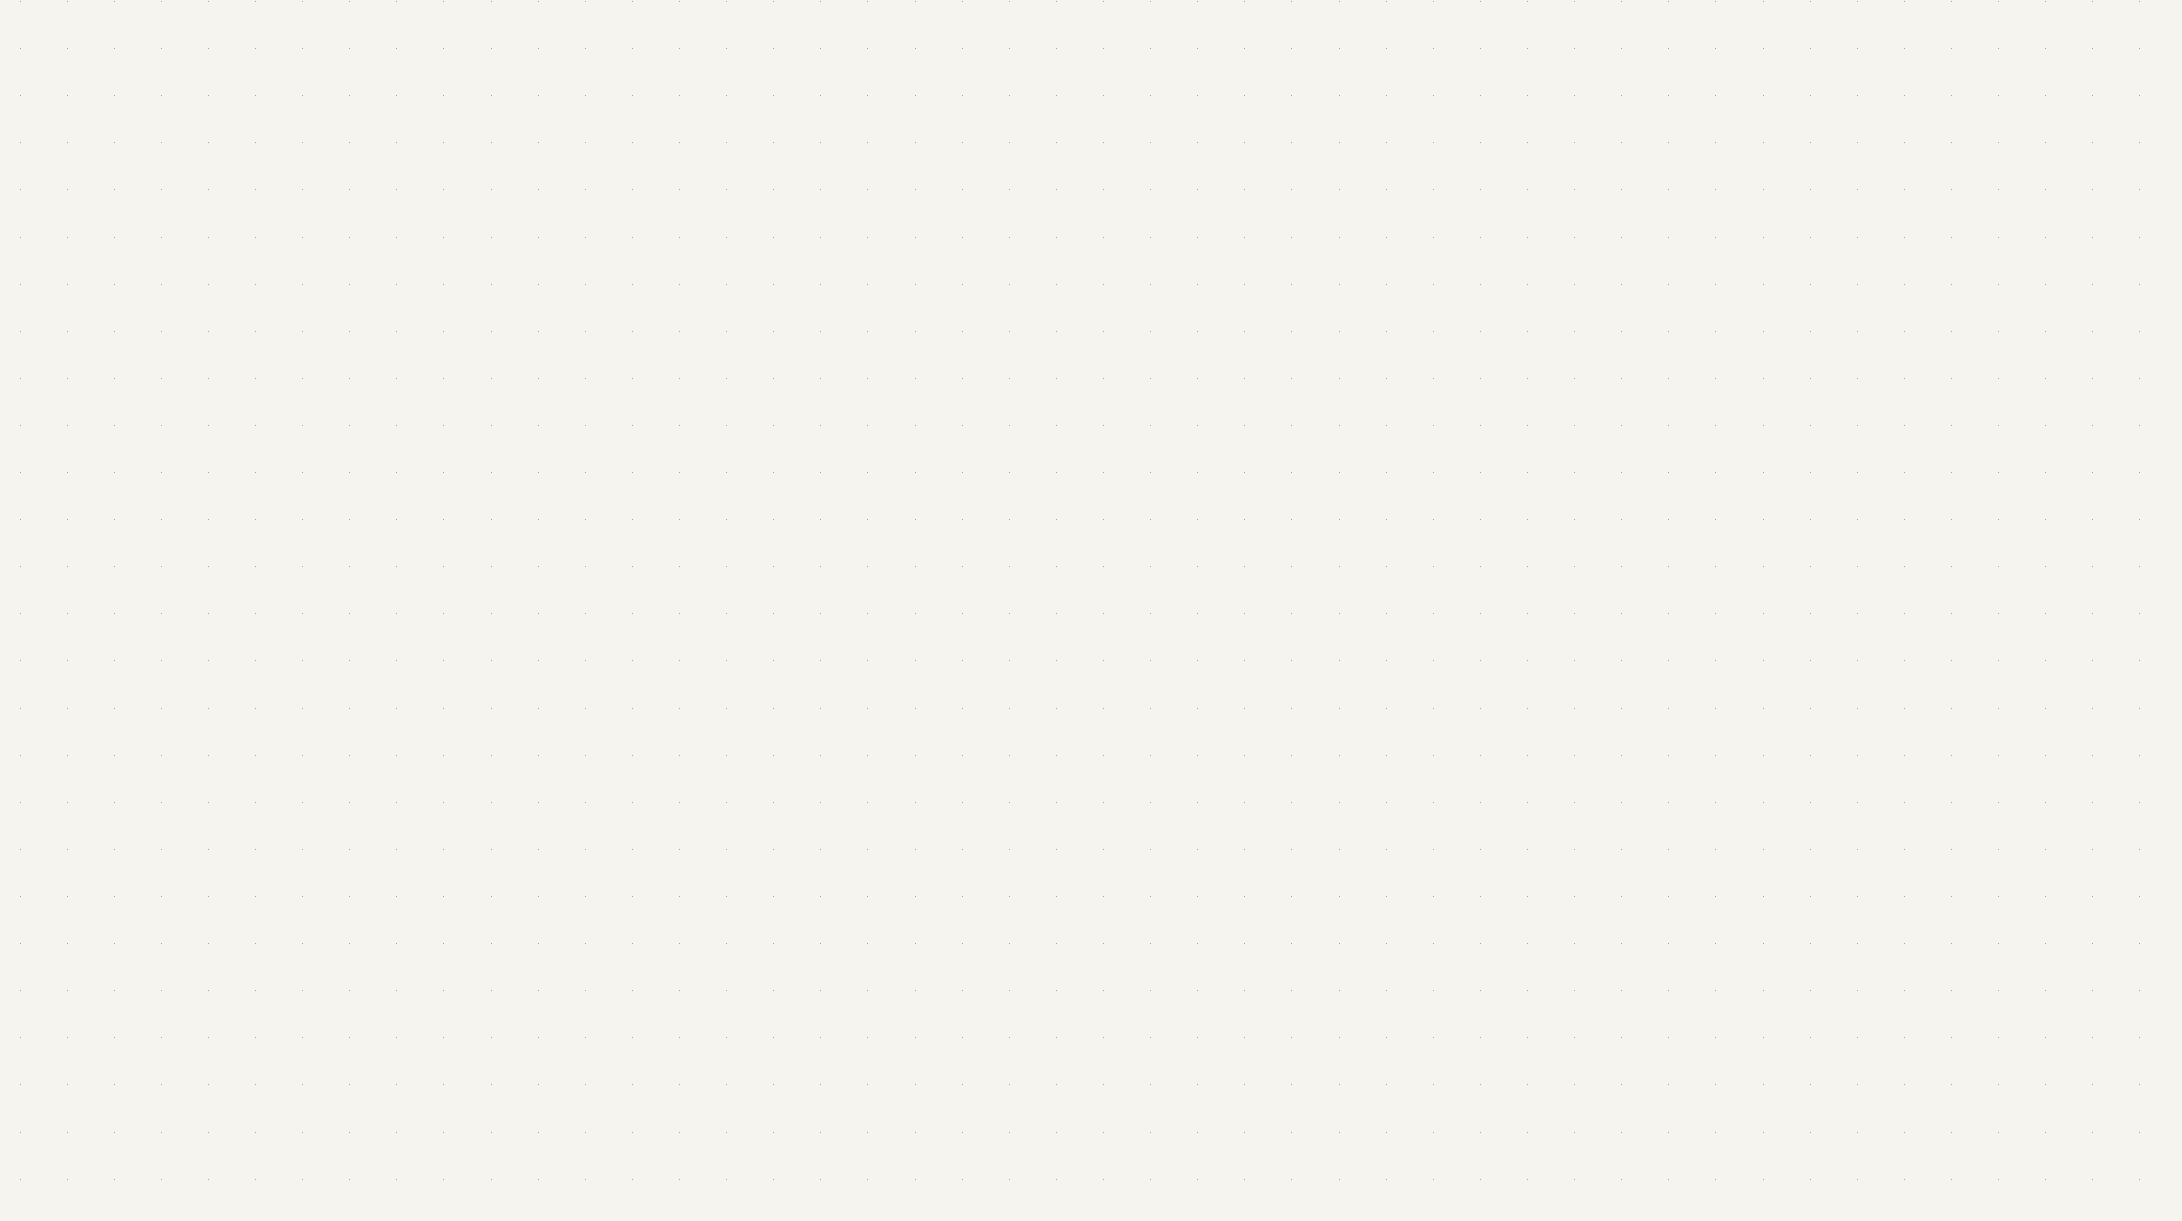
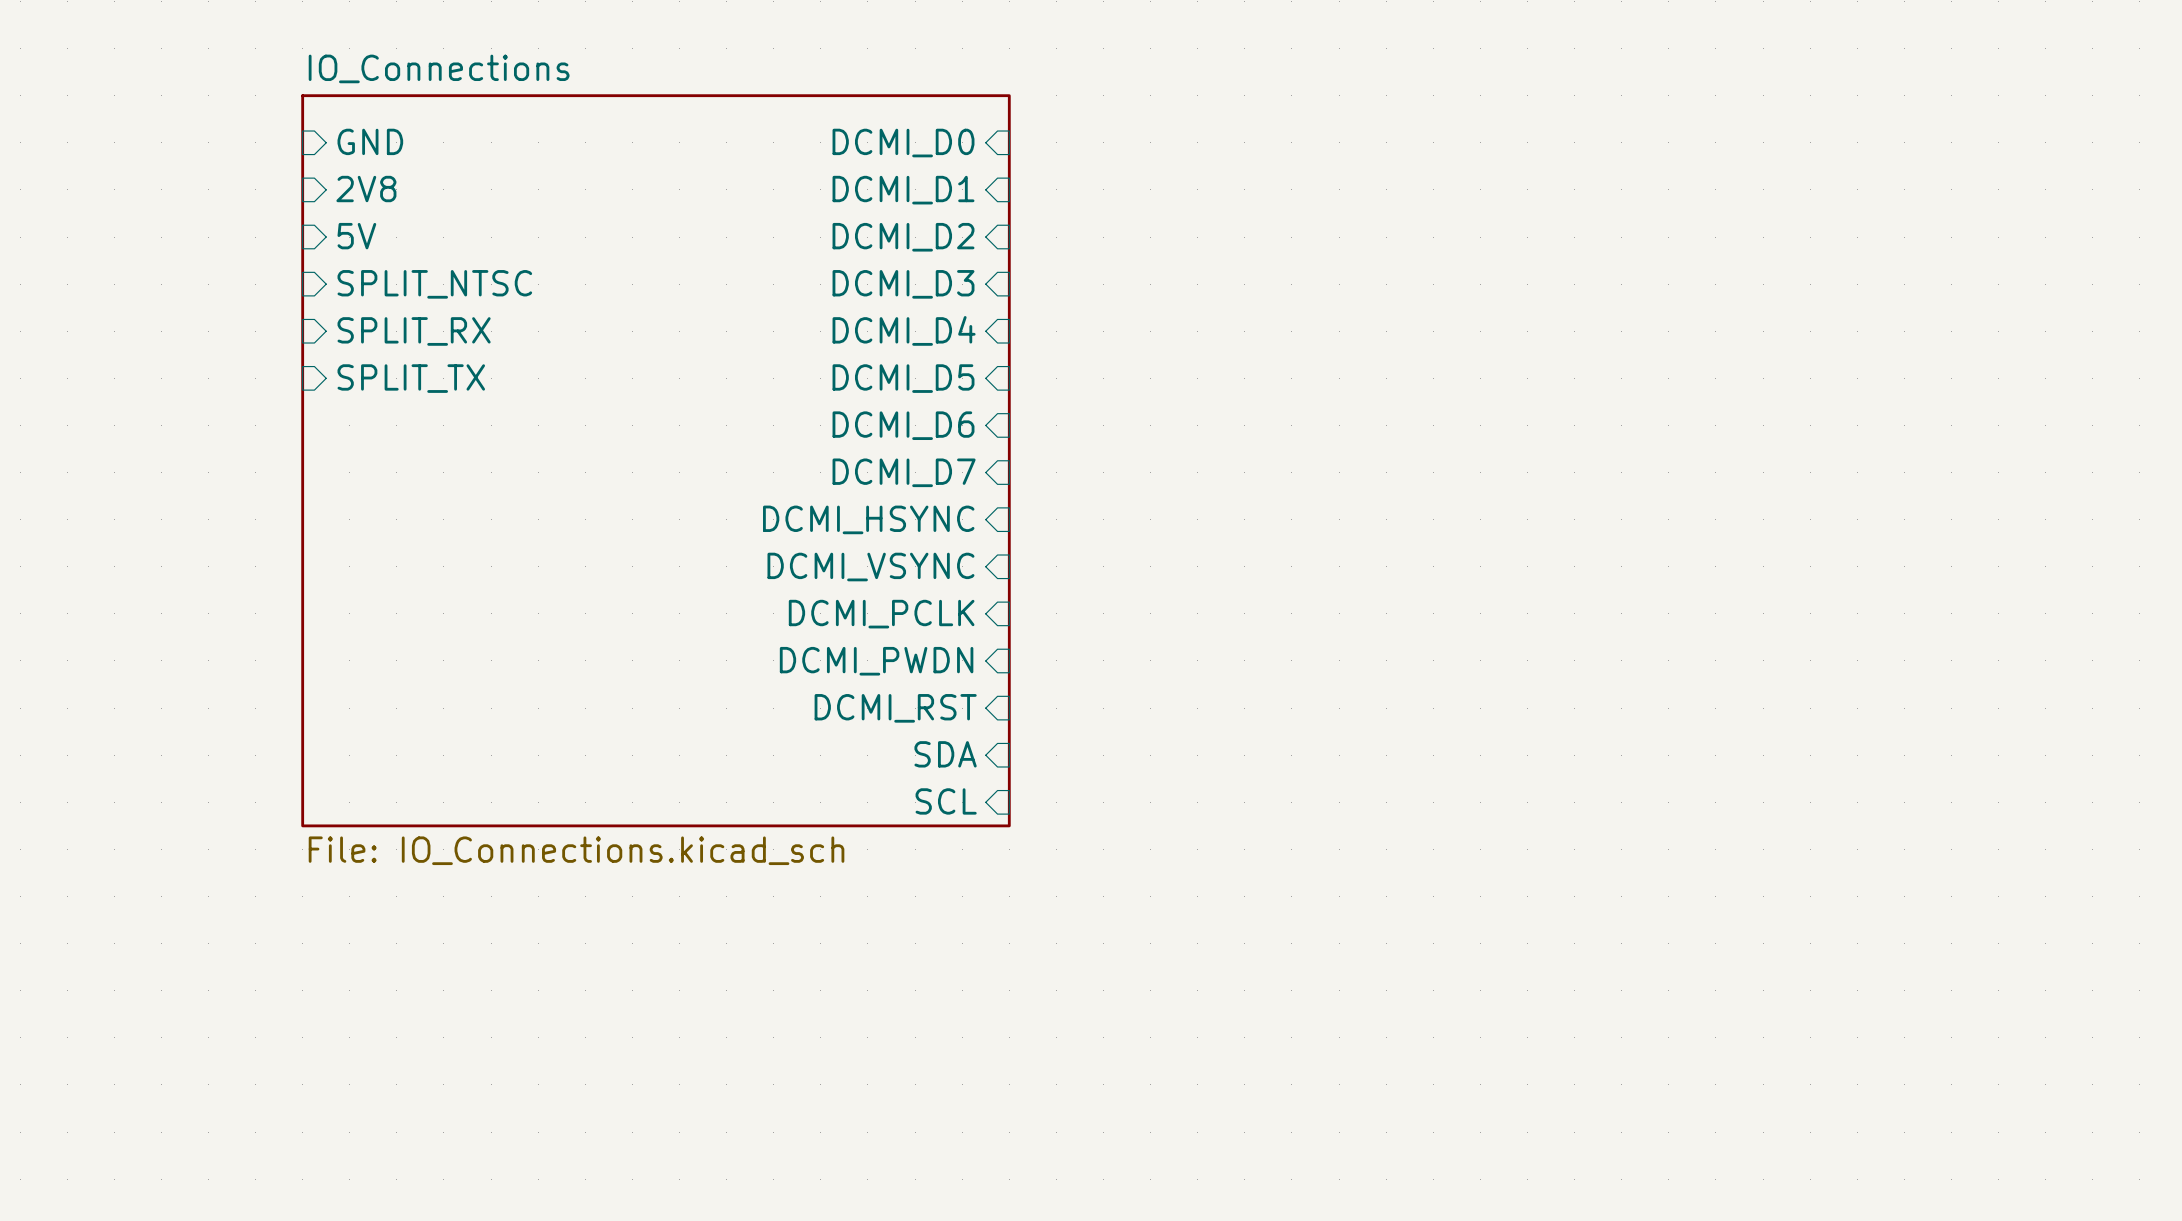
sheet pin: none -> GND (370, 141)
sheet pin: none -> DCMI_D0 (903, 143)
sheet pin: none -> 2V8 (366, 189)
sheet pin: none -> DCMI_D1 (903, 190)
sheet pin: none -> 5V (356, 236)
sheet pin: none -> DCMI_D2 (903, 237)
sheet pin: none -> SPLIT_NTSC (434, 284)
sheet pin: none -> DCMI_D3 (903, 284)
sheet pin: none -> DCMI_D4 (904, 330)
sheet pin: none -> SPLIT_RX (414, 331)
sheet pin: none -> SPLIT_TX (411, 378)
sheet pin: none -> DCMI_D5 (903, 378)
sheet pin: none -> DCMI_D6 (903, 425)
sheet IO_Connections: none -> File: IO_Connections.kicad_sch (655, 460)
sheet pin: none -> DCMI_D7 (904, 472)
sheet pin: none -> DCMI_HSYNC (868, 519)
sheet pin: none -> DCMI_VSYNC (870, 567)
sheet pin: none -> DCMI_PCLK (881, 614)
sheet pin: none -> DCMI_PWDN (876, 661)
sheet pin: none -> DCMI_RST (895, 708)
sheet pin: none -> SDA (945, 754)
sheet pin: none -> SCL (946, 801)

